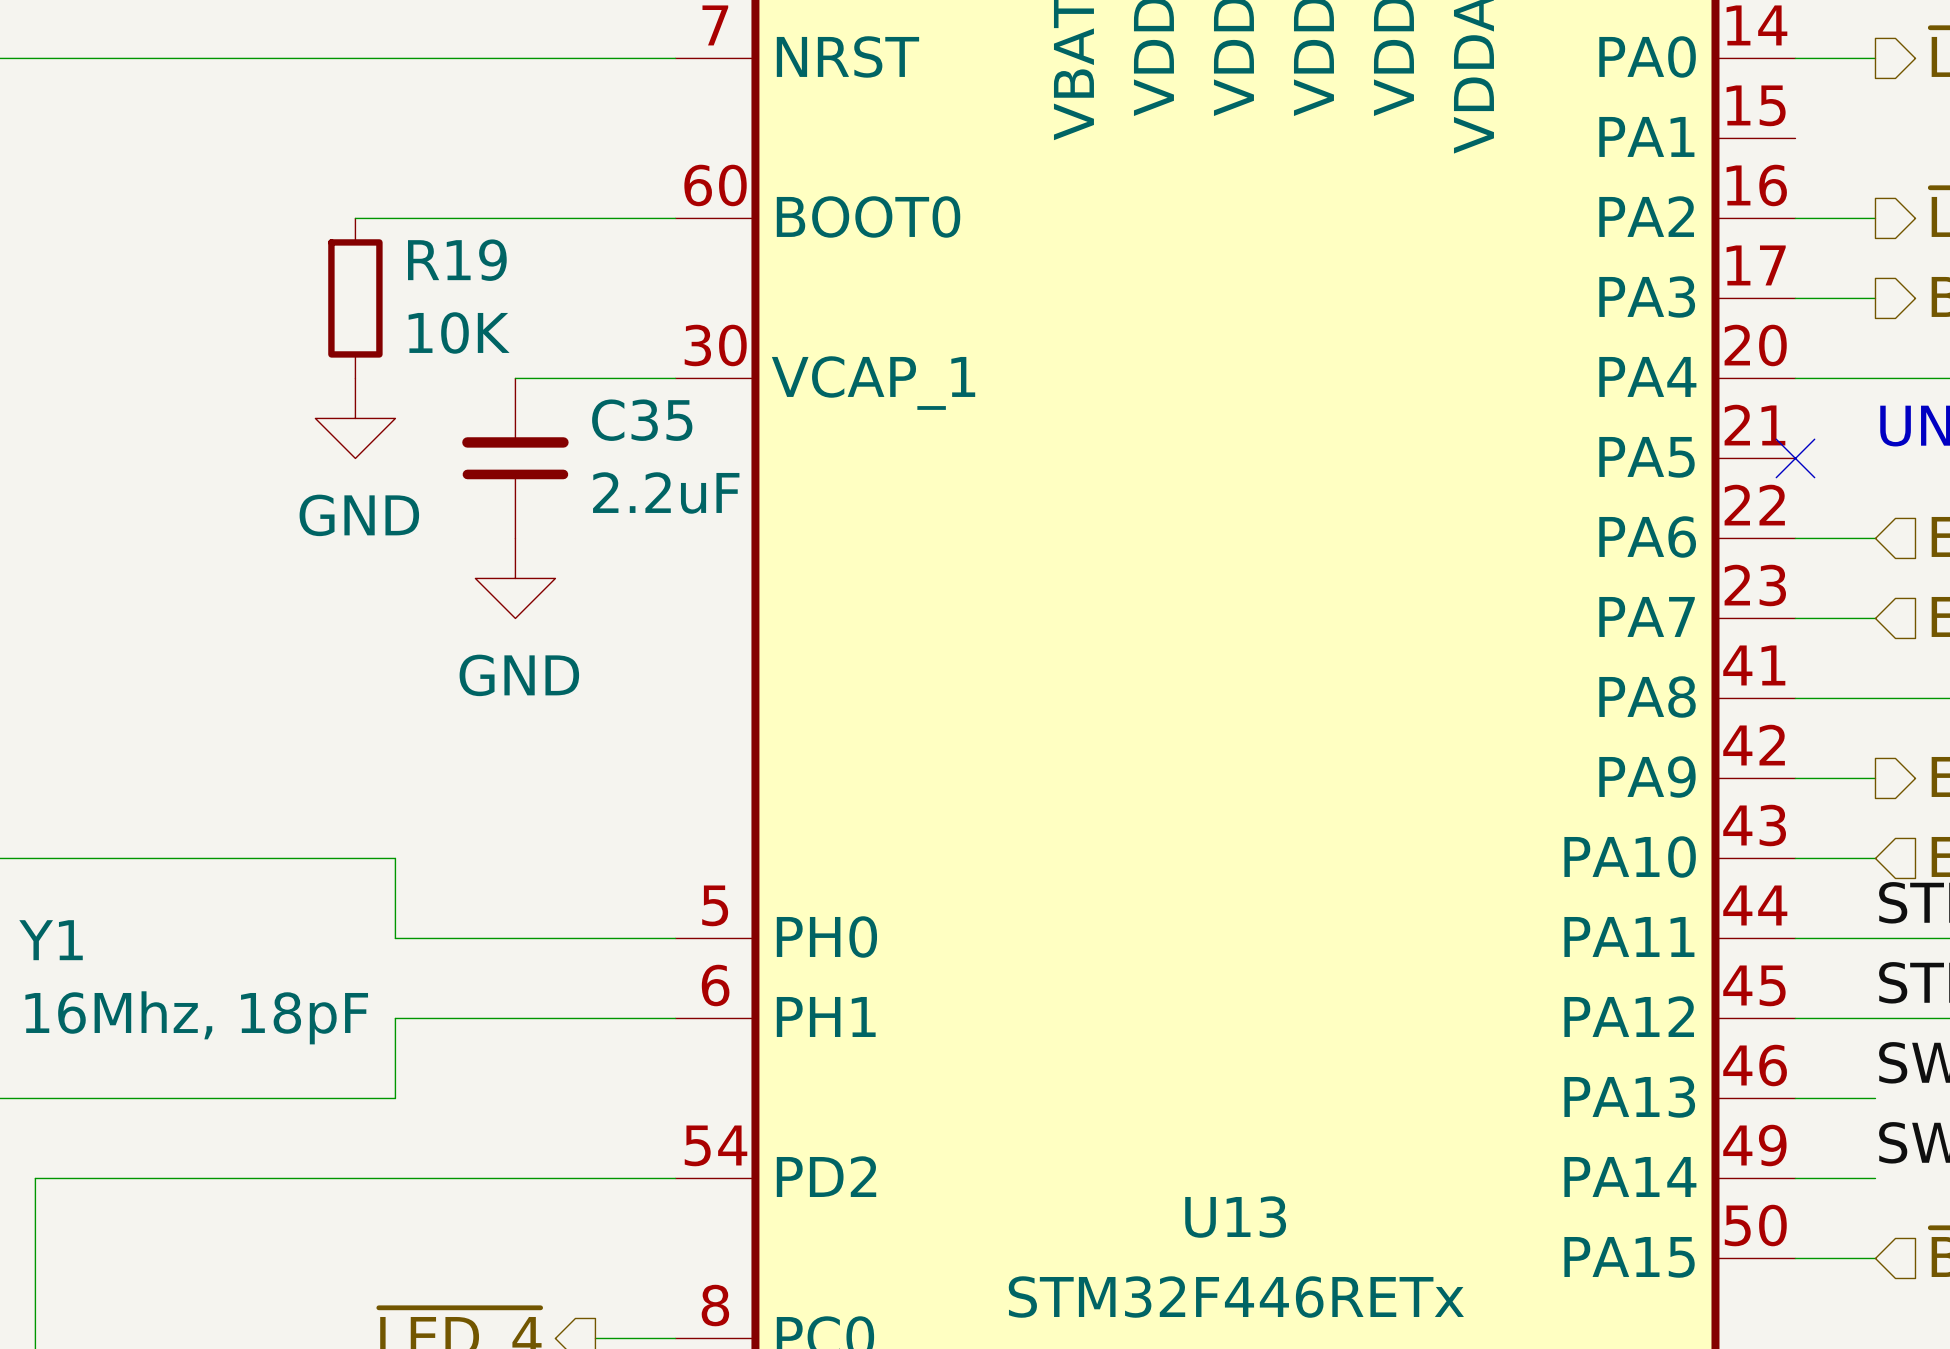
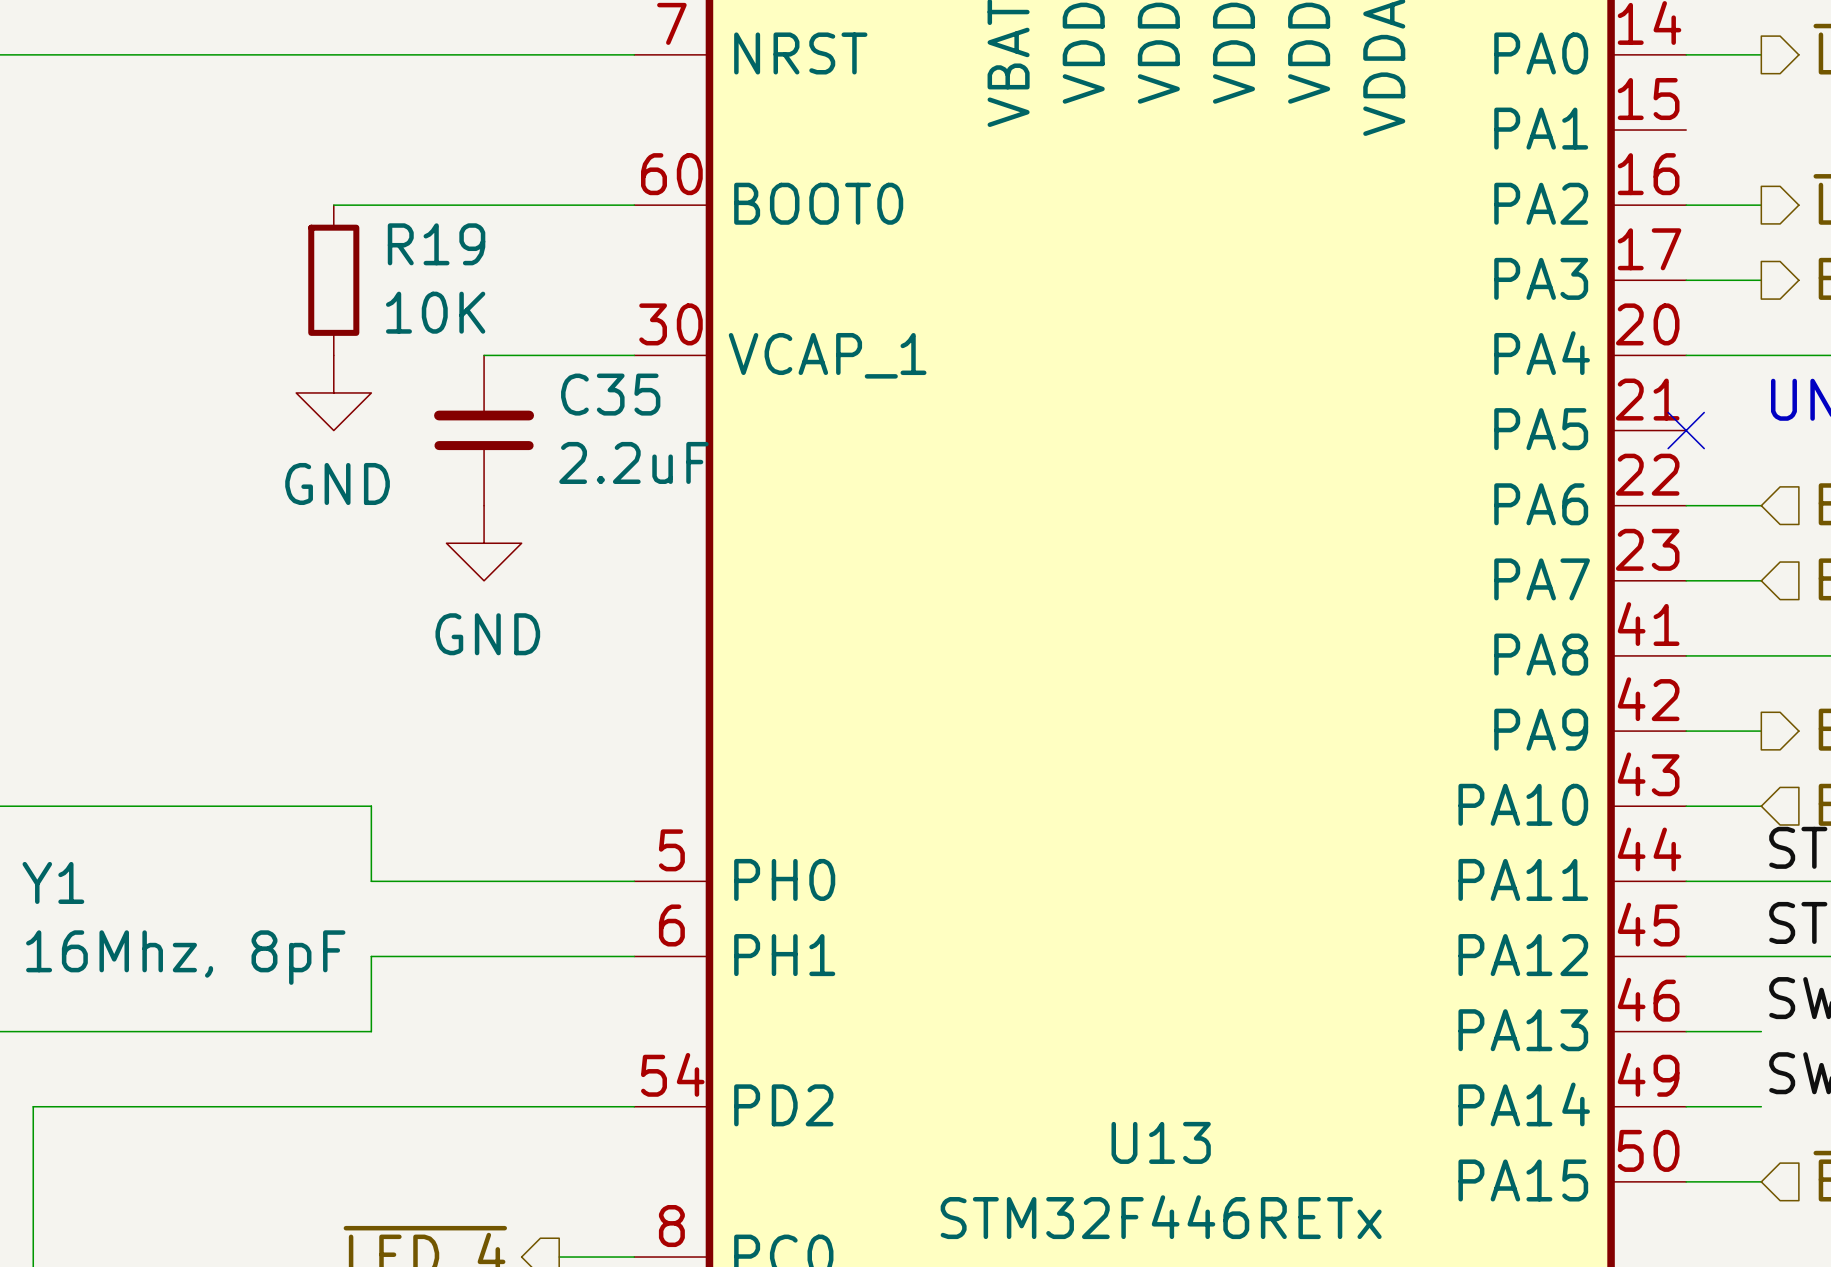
Y1 value: 16Mhz, 18pF (196, 1017) -> 16Mhz, 8pF (185, 957)

